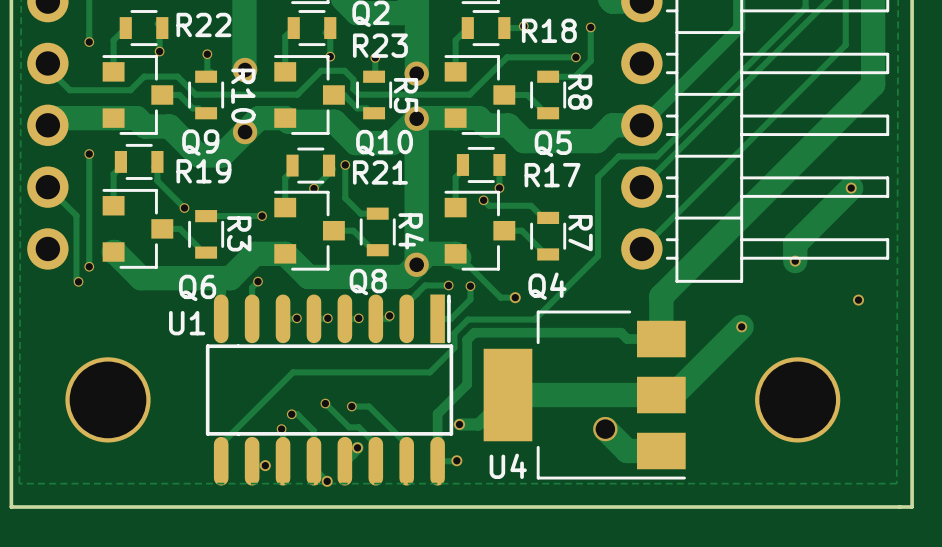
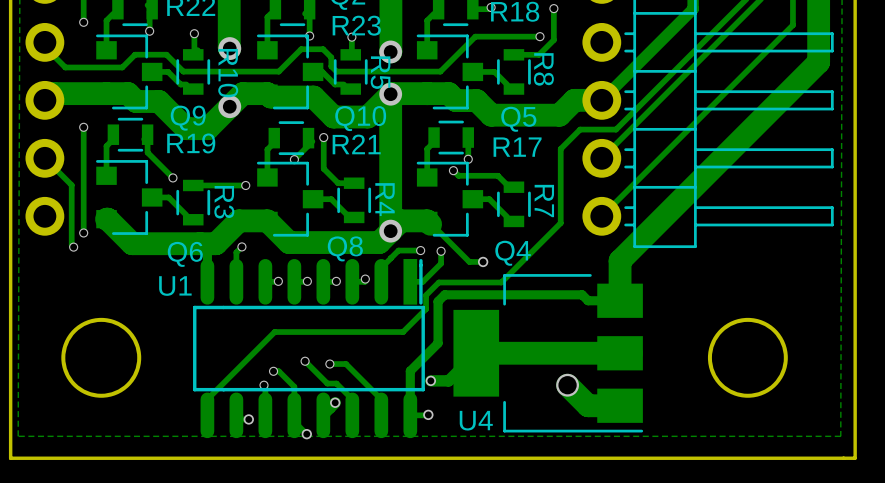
track: (851, 188) (795, 244) (795, 261) -> none
via: (851, 188) -> none
via: (795, 261) -> none
via: (858, 300) -> none
track: (741, 326) (673, 395) -> none
via: (741, 326) -> none

